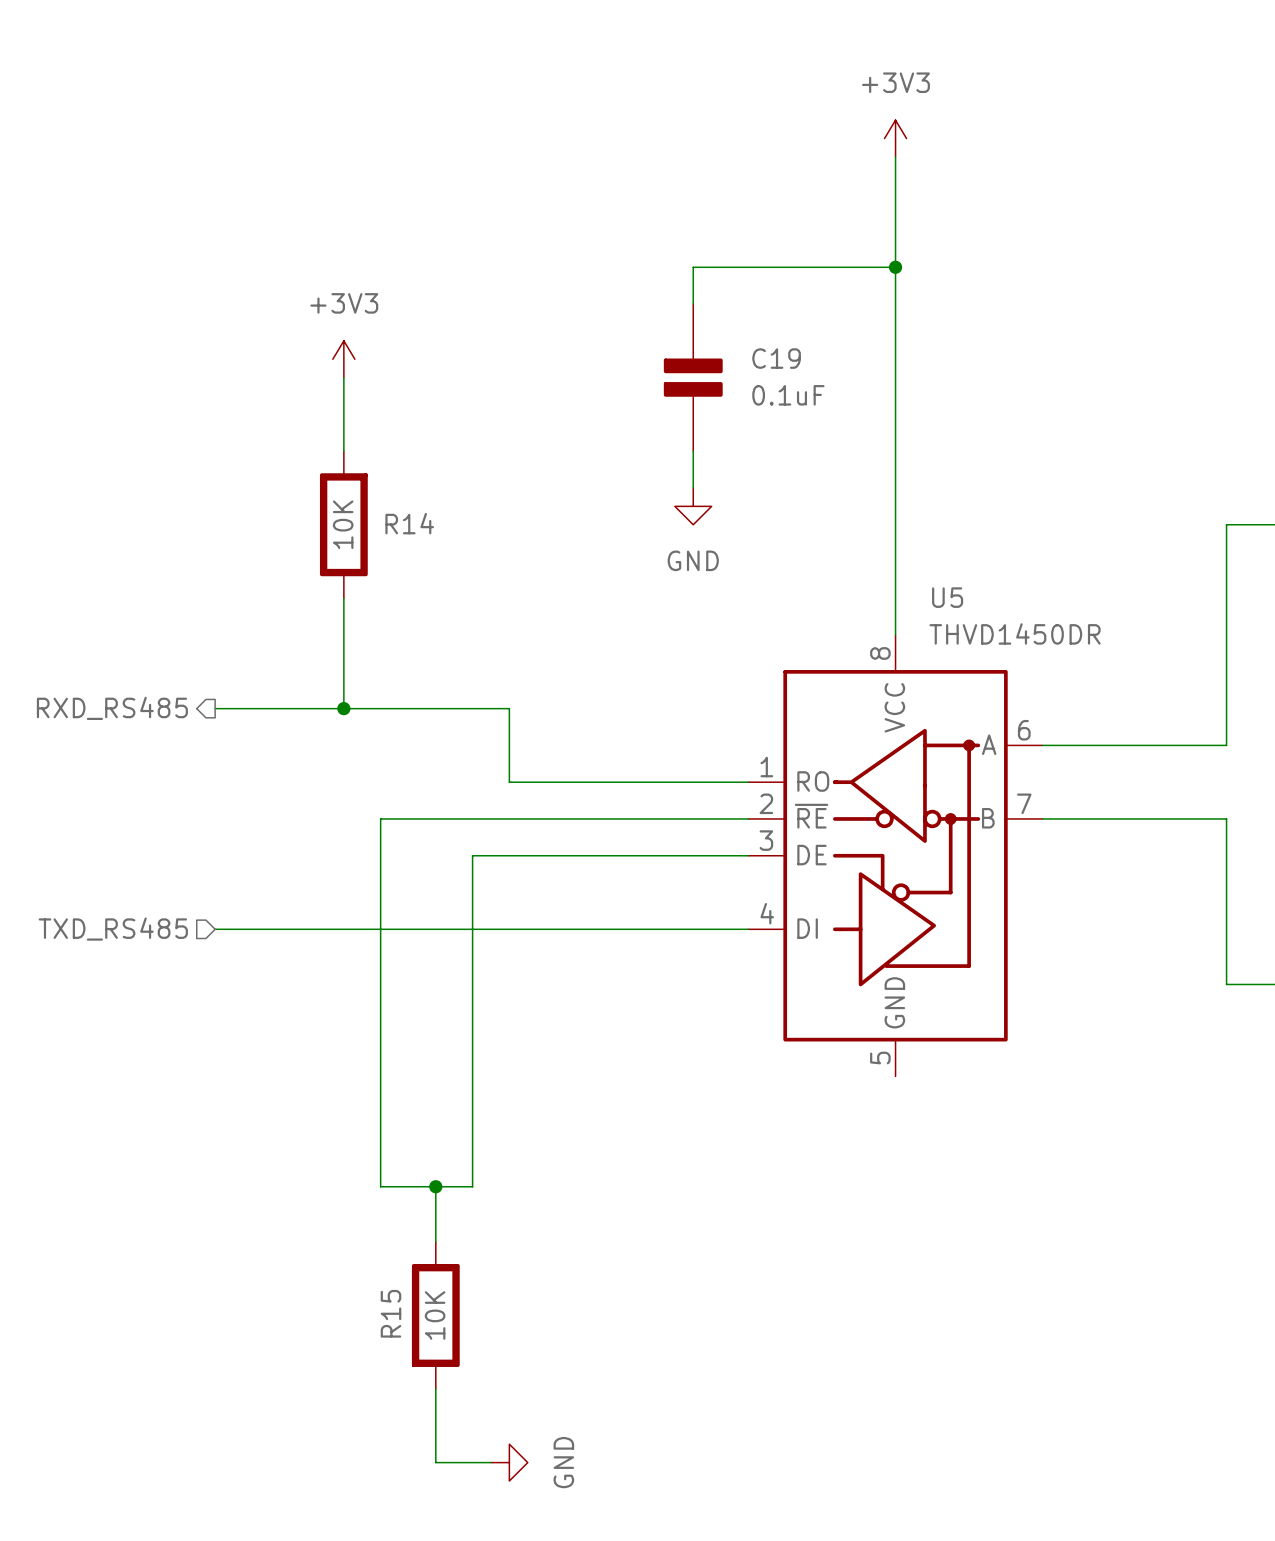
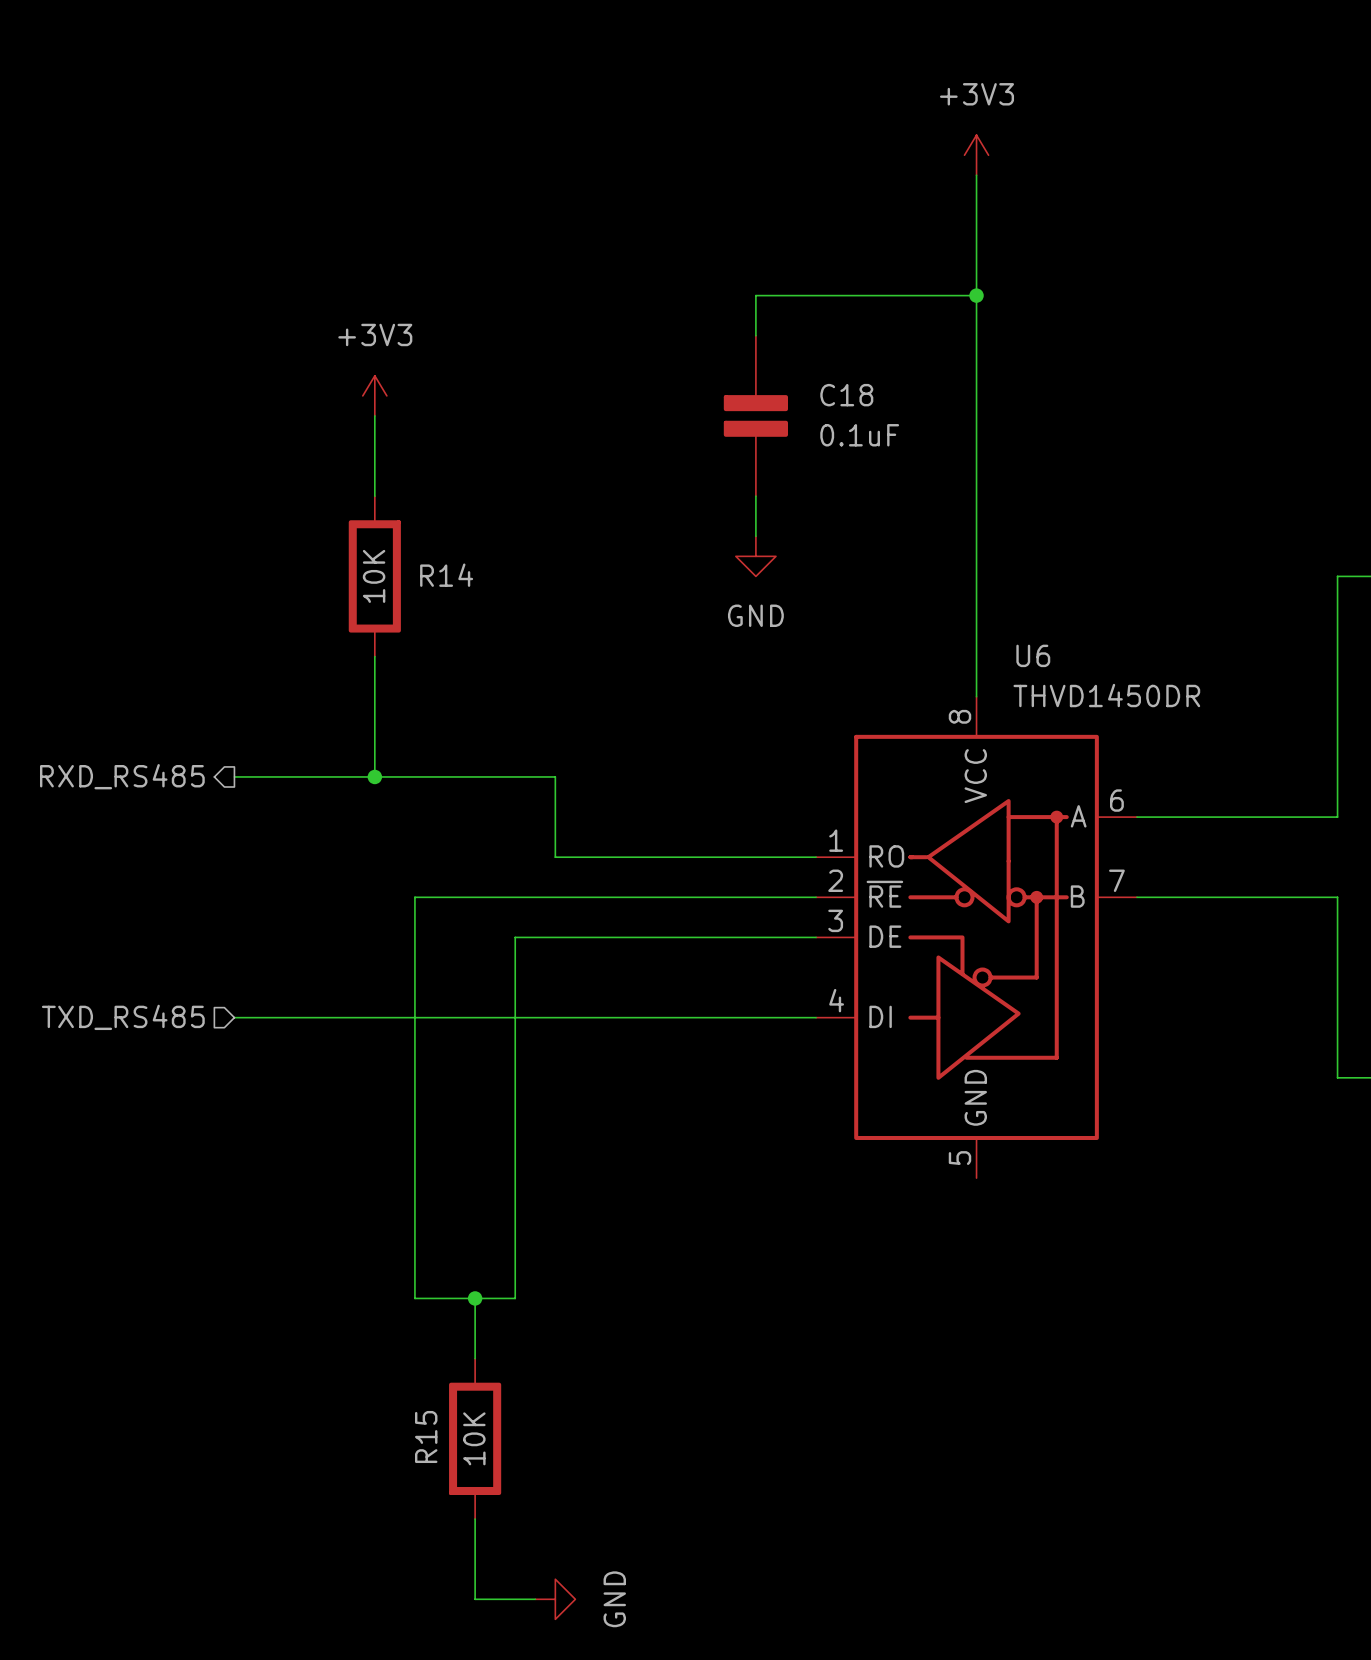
C19 name: C19 (776, 358) -> C18 (846, 395)
U5 name: U5 (947, 597) -> U6 (1033, 655)

